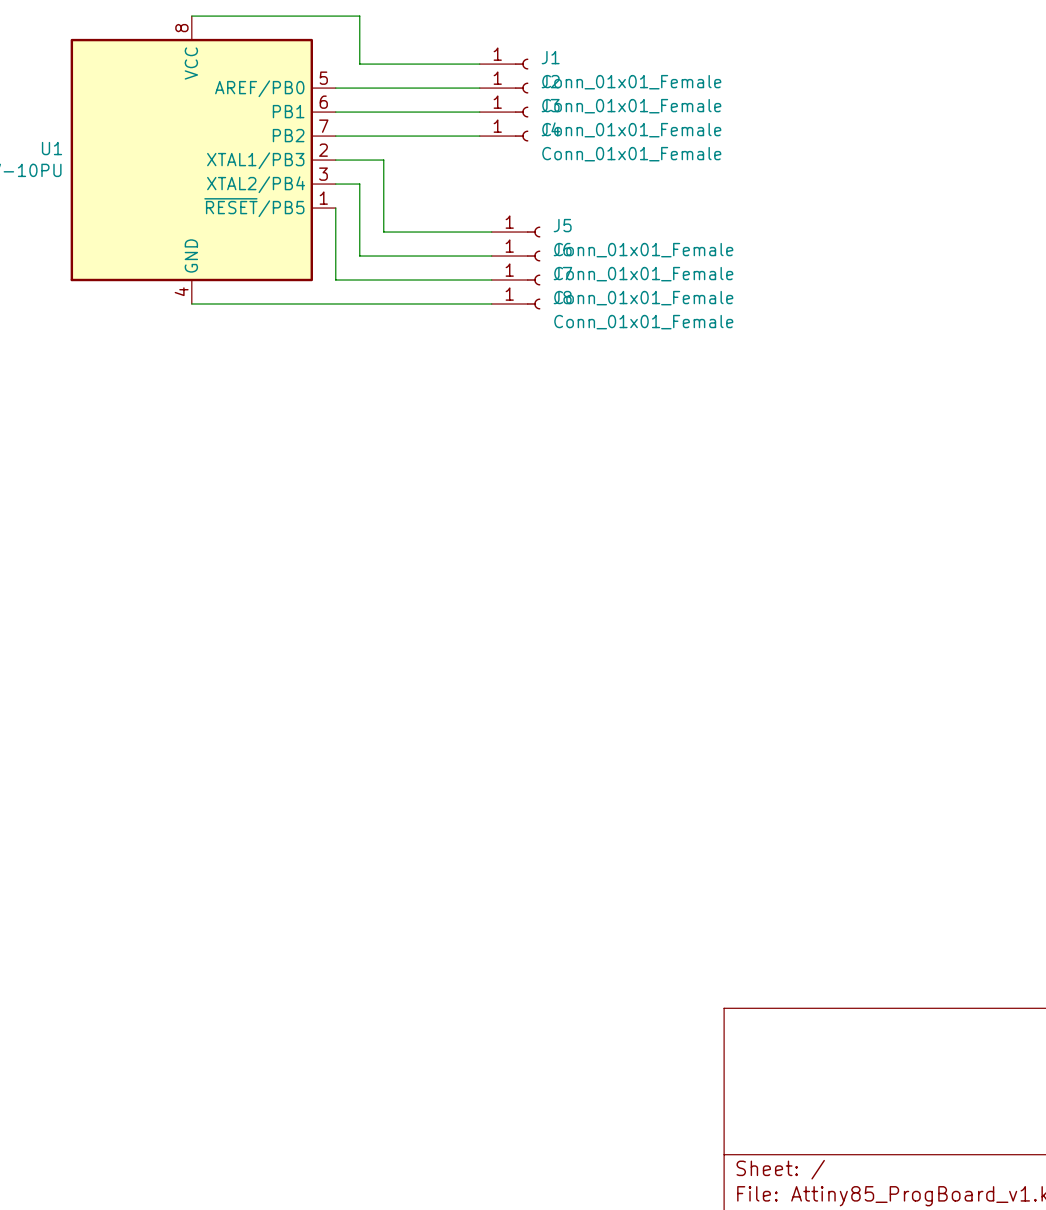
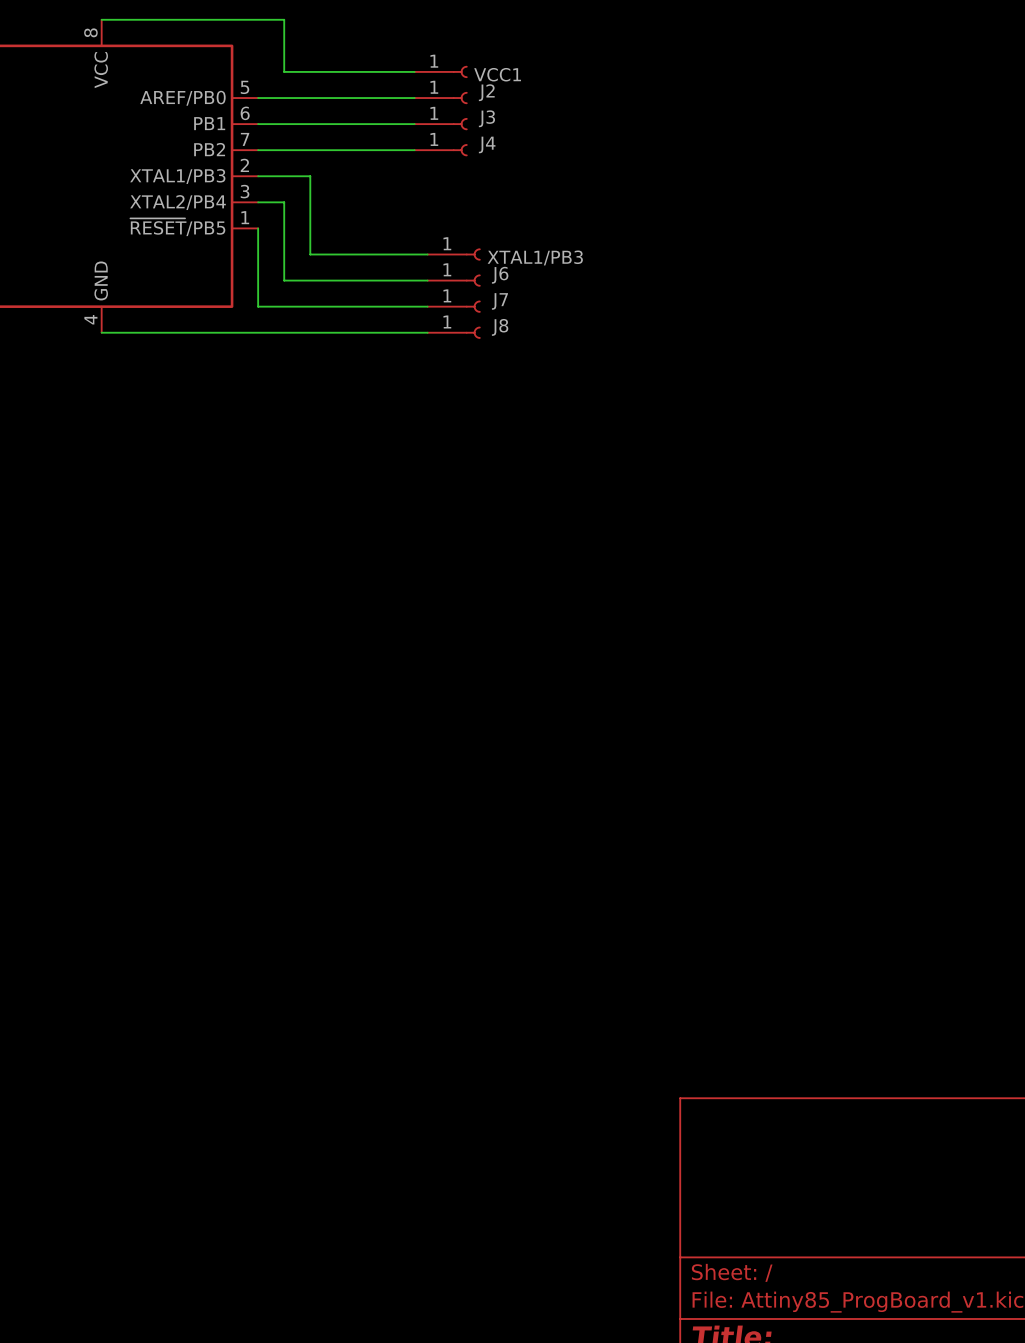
J1 name: J1 (550, 57) -> VCC1 (497, 74)
J1 value: Conn_01x01_Female (631, 82) -> none
J2 value: Conn_01x01_Female (631, 106) -> none
J3 value: Conn_01x01_Female (631, 130) -> none
J4 value: Conn_01x01_Female (631, 154) -> none
J5 name: J5 (562, 225) -> XTAL1/PB3 (535, 257)
J5 value: Conn_01x01_Female (643, 250) -> none
J6 value: Conn_01x01_Female (643, 274) -> none
J7 value: Conn_01x01_Female (643, 298) -> none
J8 value: Conn_01x01_Female (643, 322) -> none

